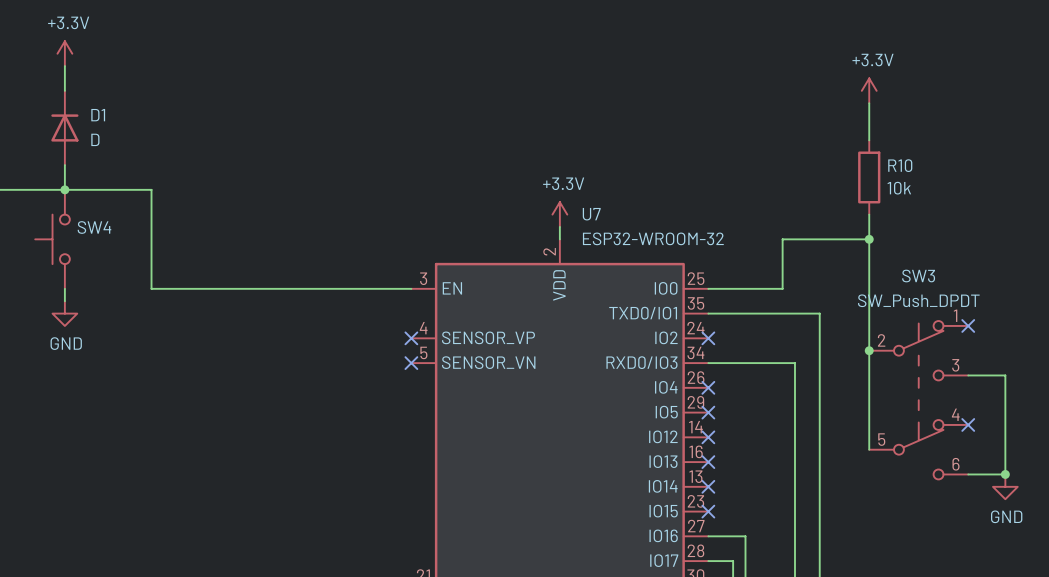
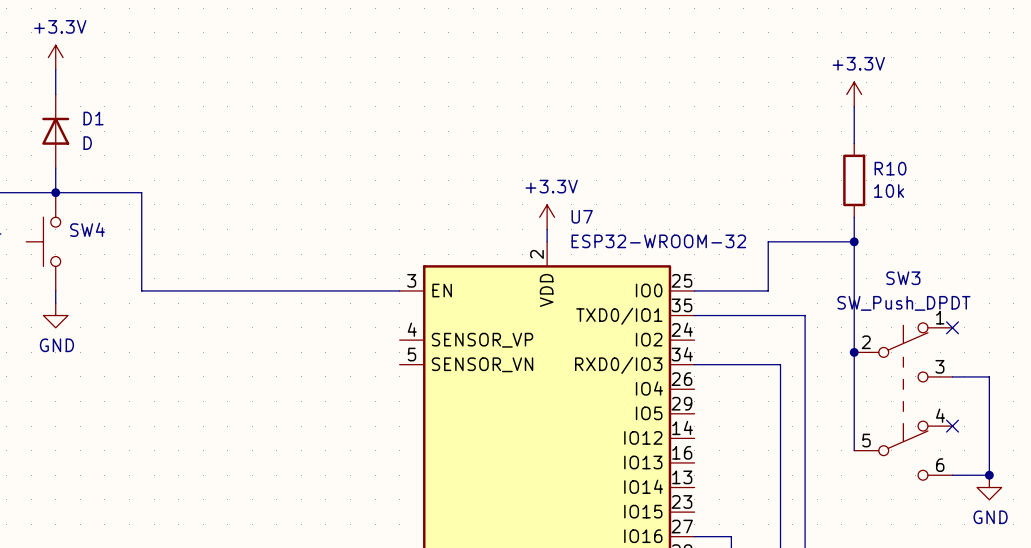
no-connect mark: (411, 338) -> none
no-connect mark: (708, 338) -> none
no-connect mark: (411, 363) -> none
no-connect mark: (708, 387) -> none
no-connect mark: (708, 412) -> none
no-connect mark: (708, 437) -> none
no-connect mark: (708, 462) -> none
no-connect mark: (708, 486) -> none
no-connect mark: (708, 511) -> none

